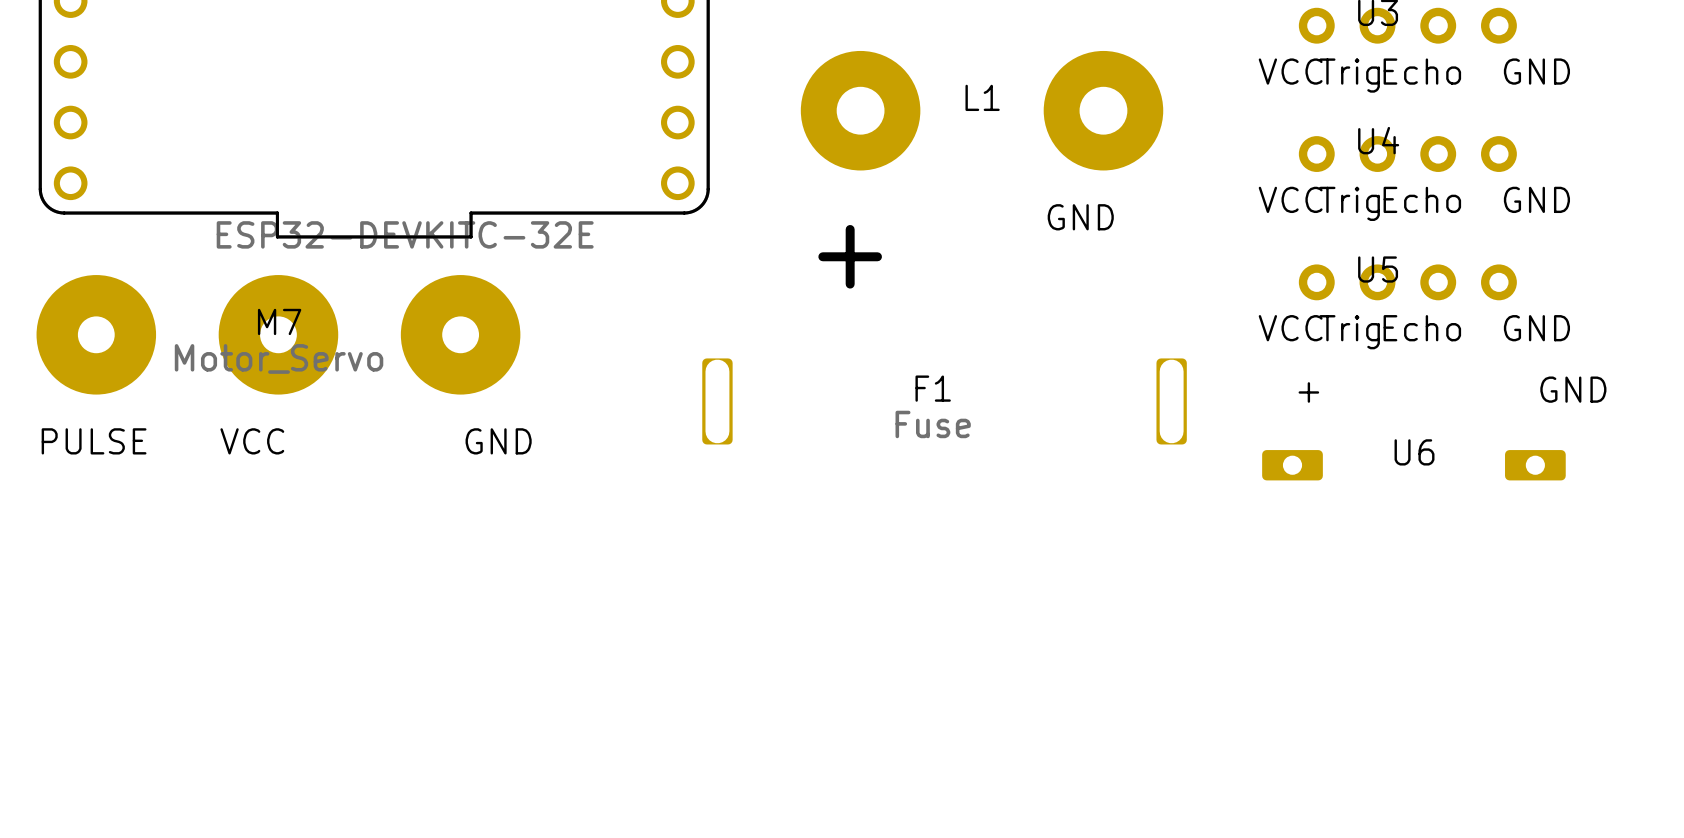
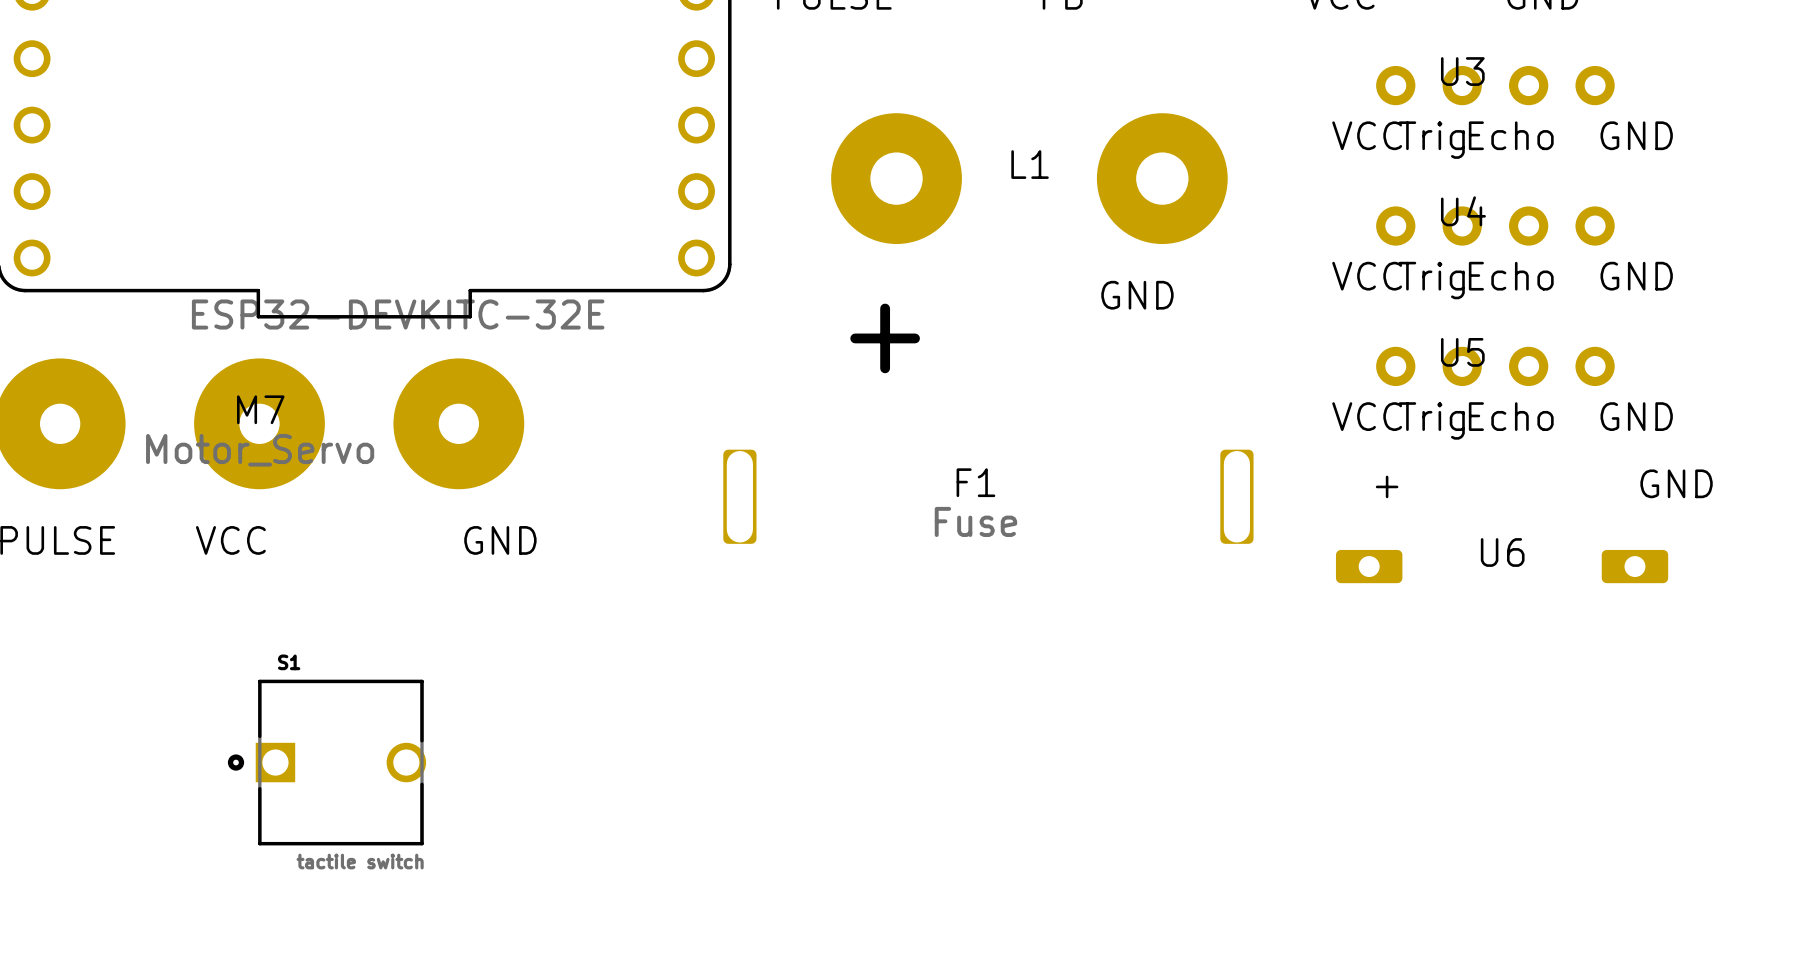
S1: none -> tactile switch (326, 762)

